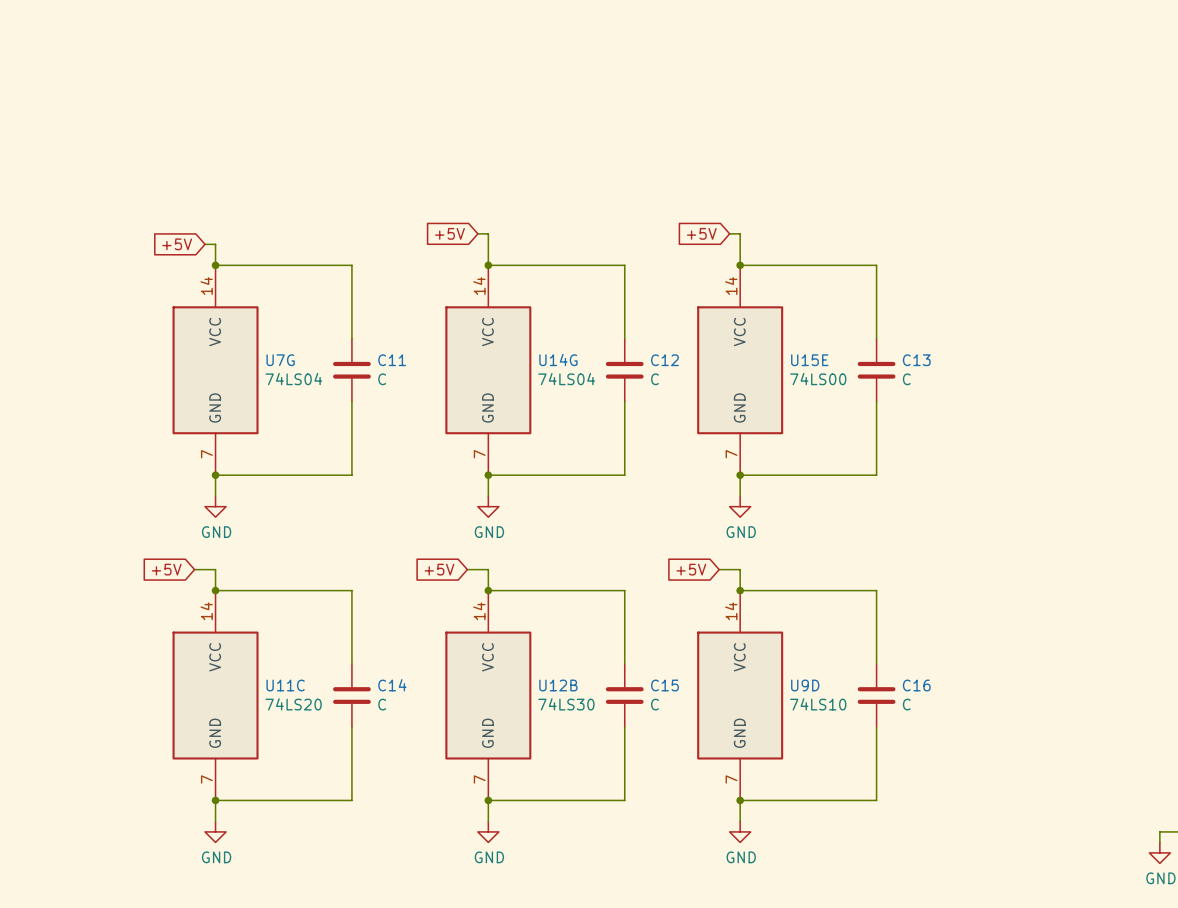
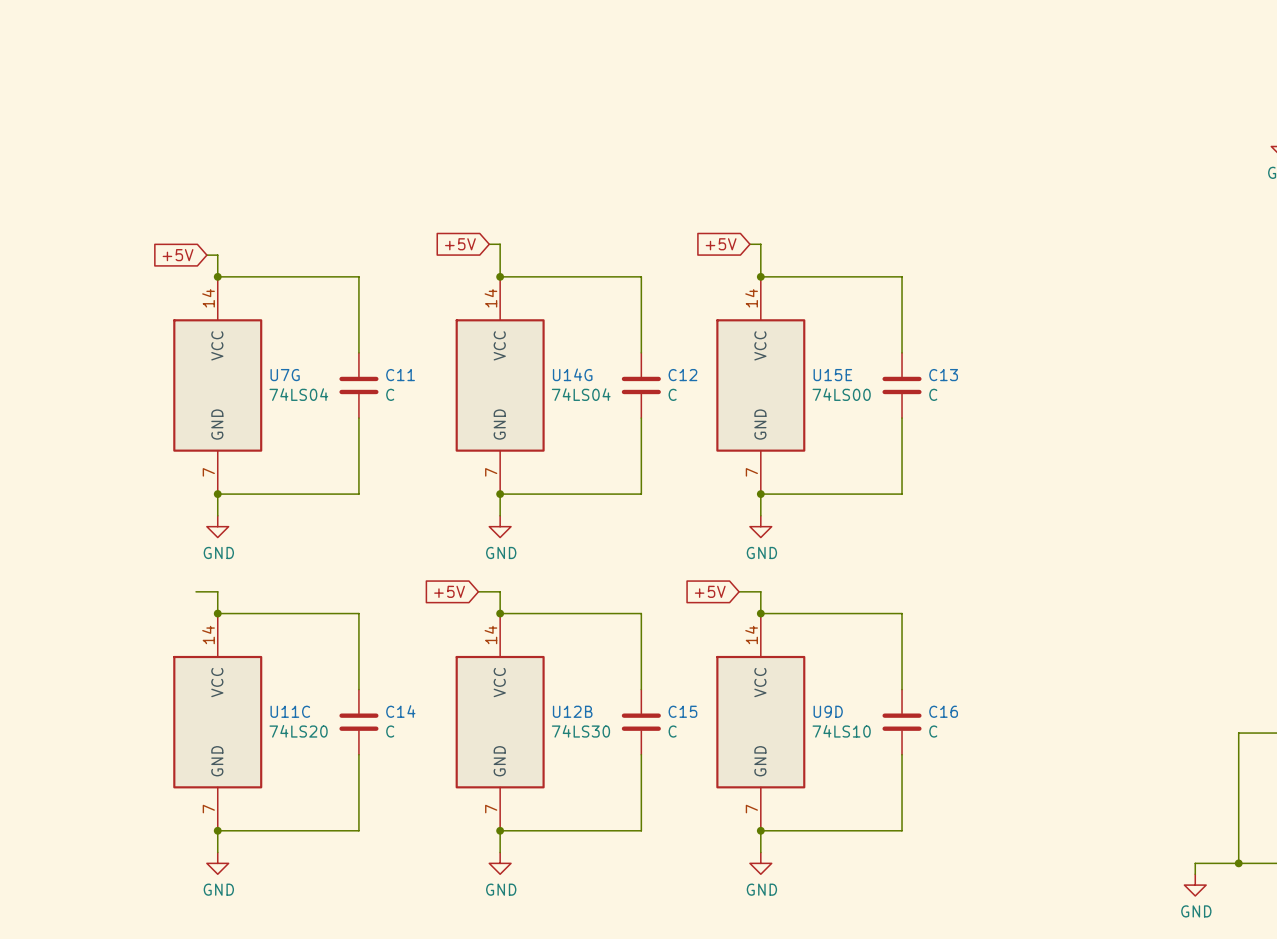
global label: +5V (166, 569) -> none

